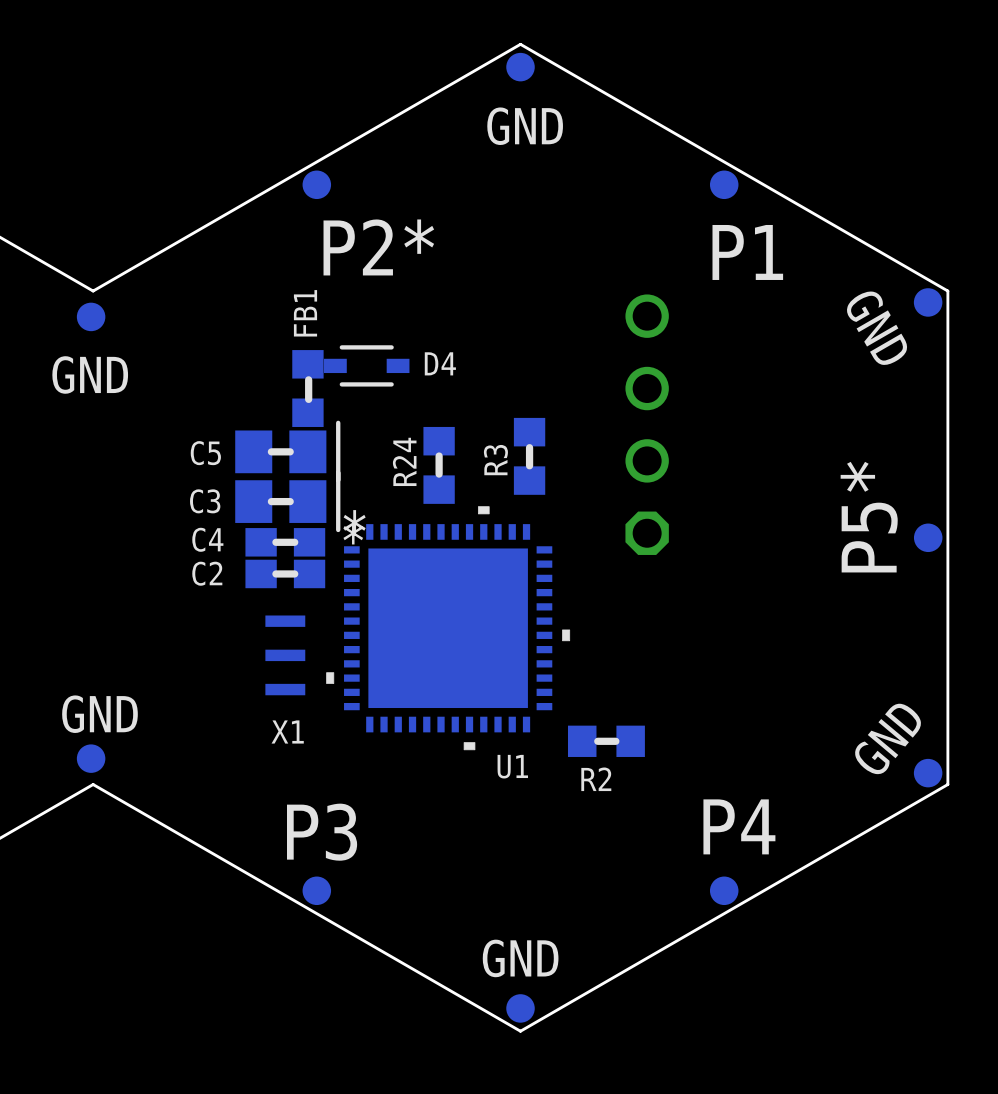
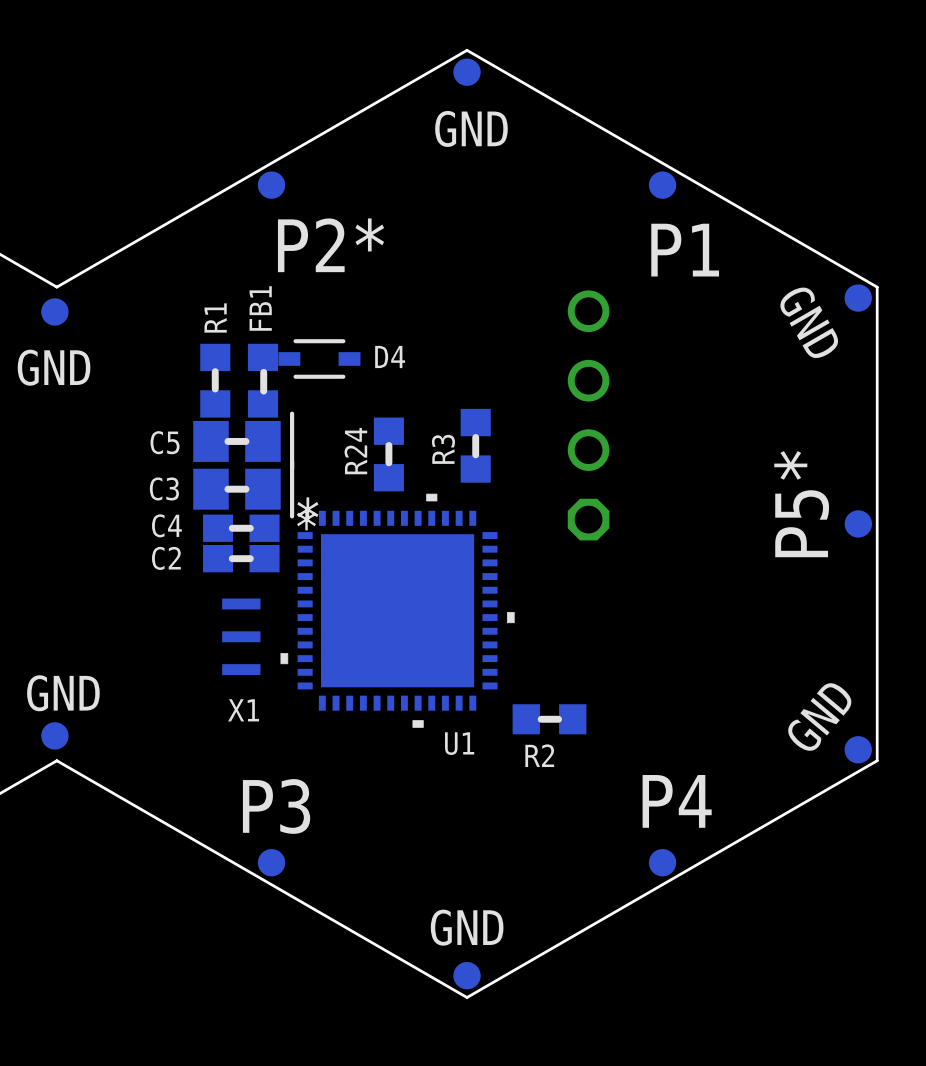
R1: none -> (215, 380)

